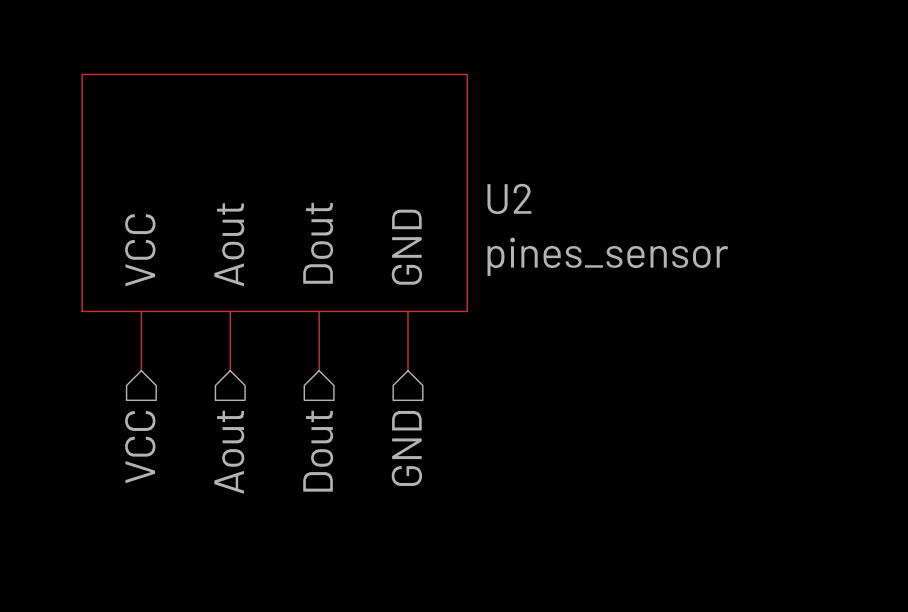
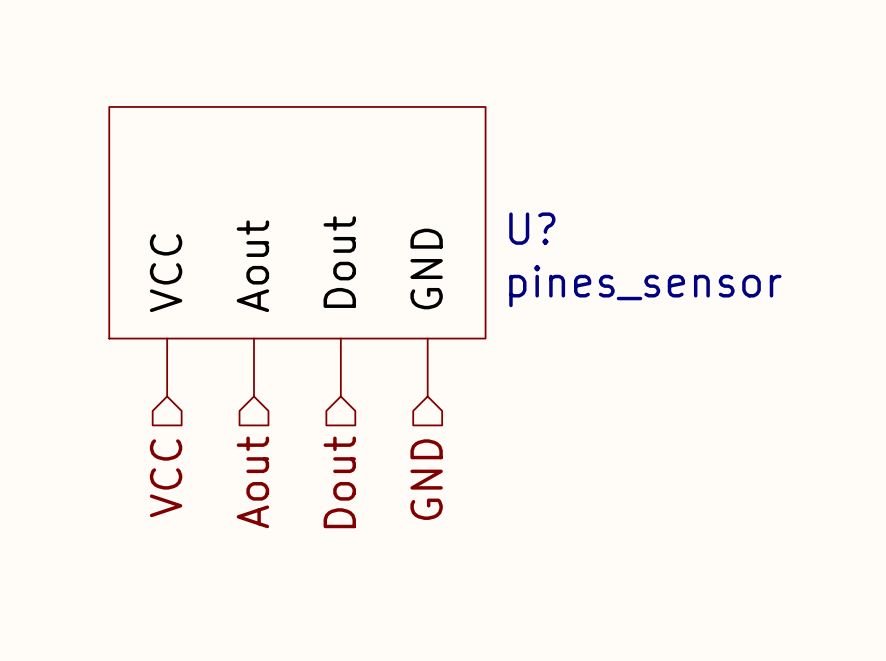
U2 name: U2 (509, 198) -> U? (532, 228)

